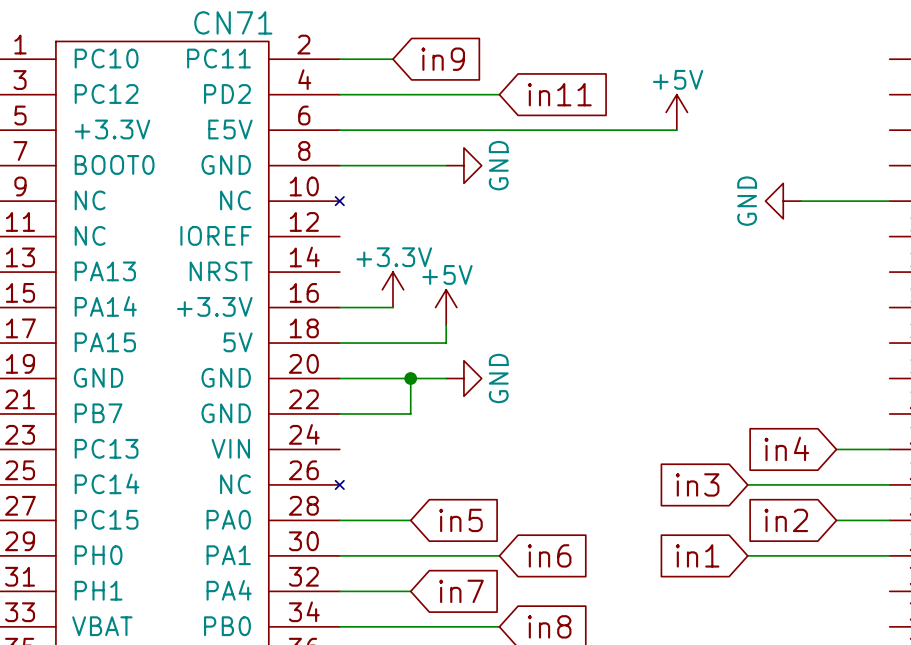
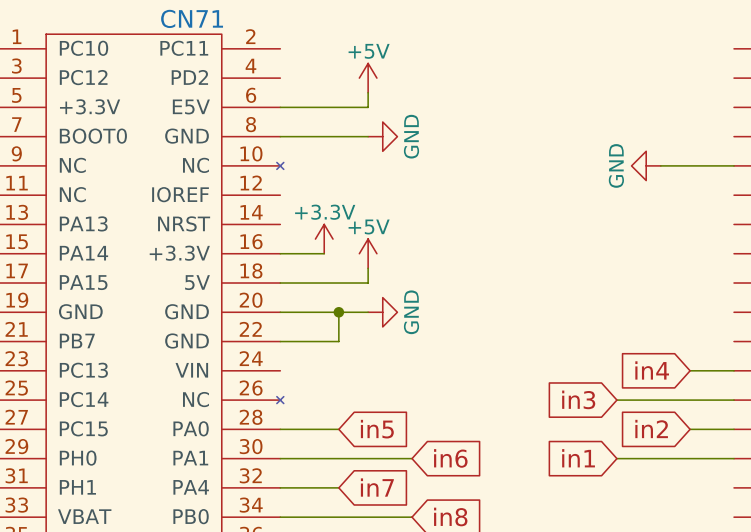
wire: (339, 59) (392, 59) -> none
global label: in9 (443, 59) -> none
wire: (339, 94) (499, 94) -> none
global label: in11 (559, 94) -> none
power symbol position: +5V (676, 112) -> +5V (368, 78)
wire: (446, 130) (676, 130) -> (368, 107) (368, 92)

